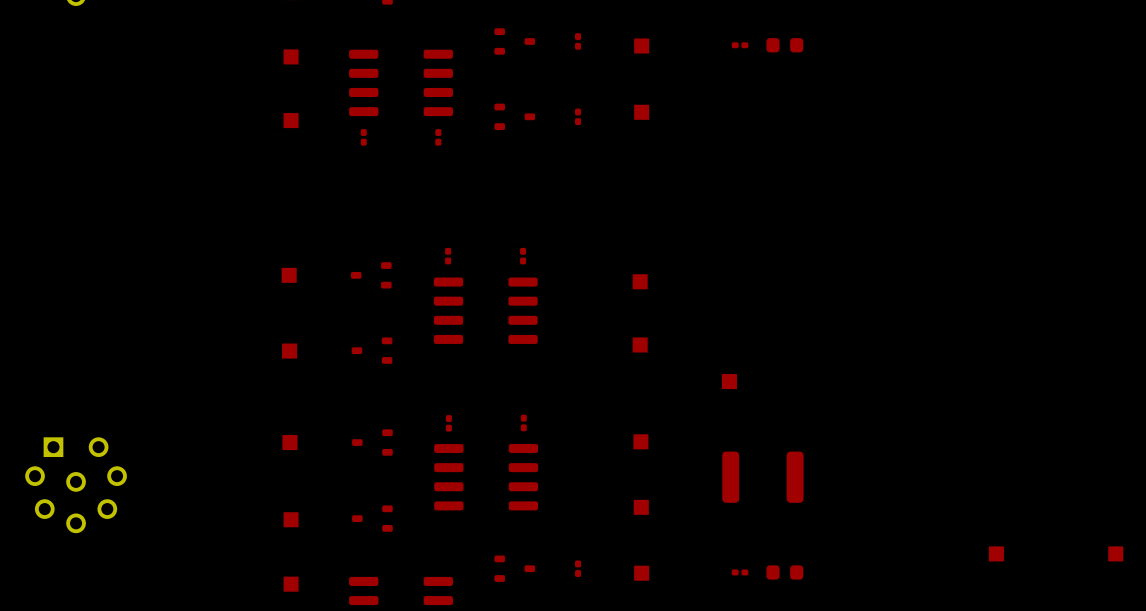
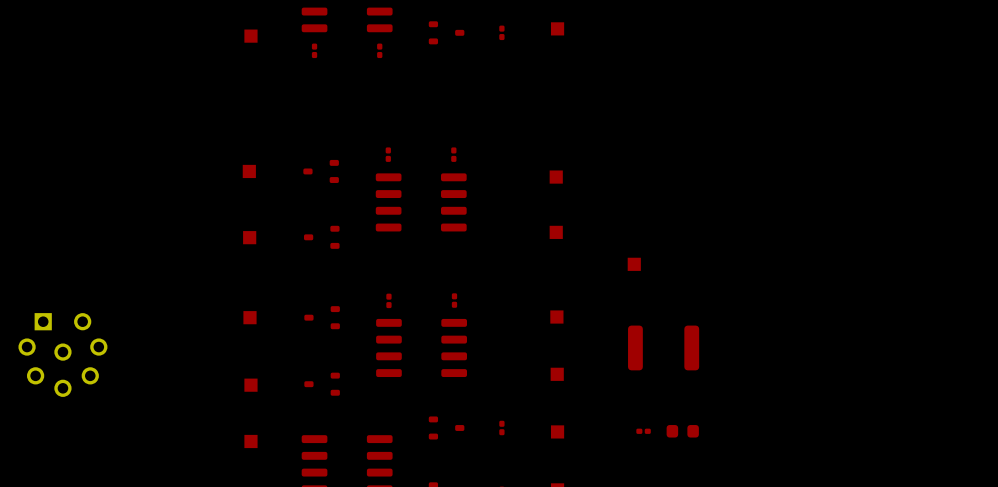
part: (996, 553) -> none
part: (1115, 553) -> none

